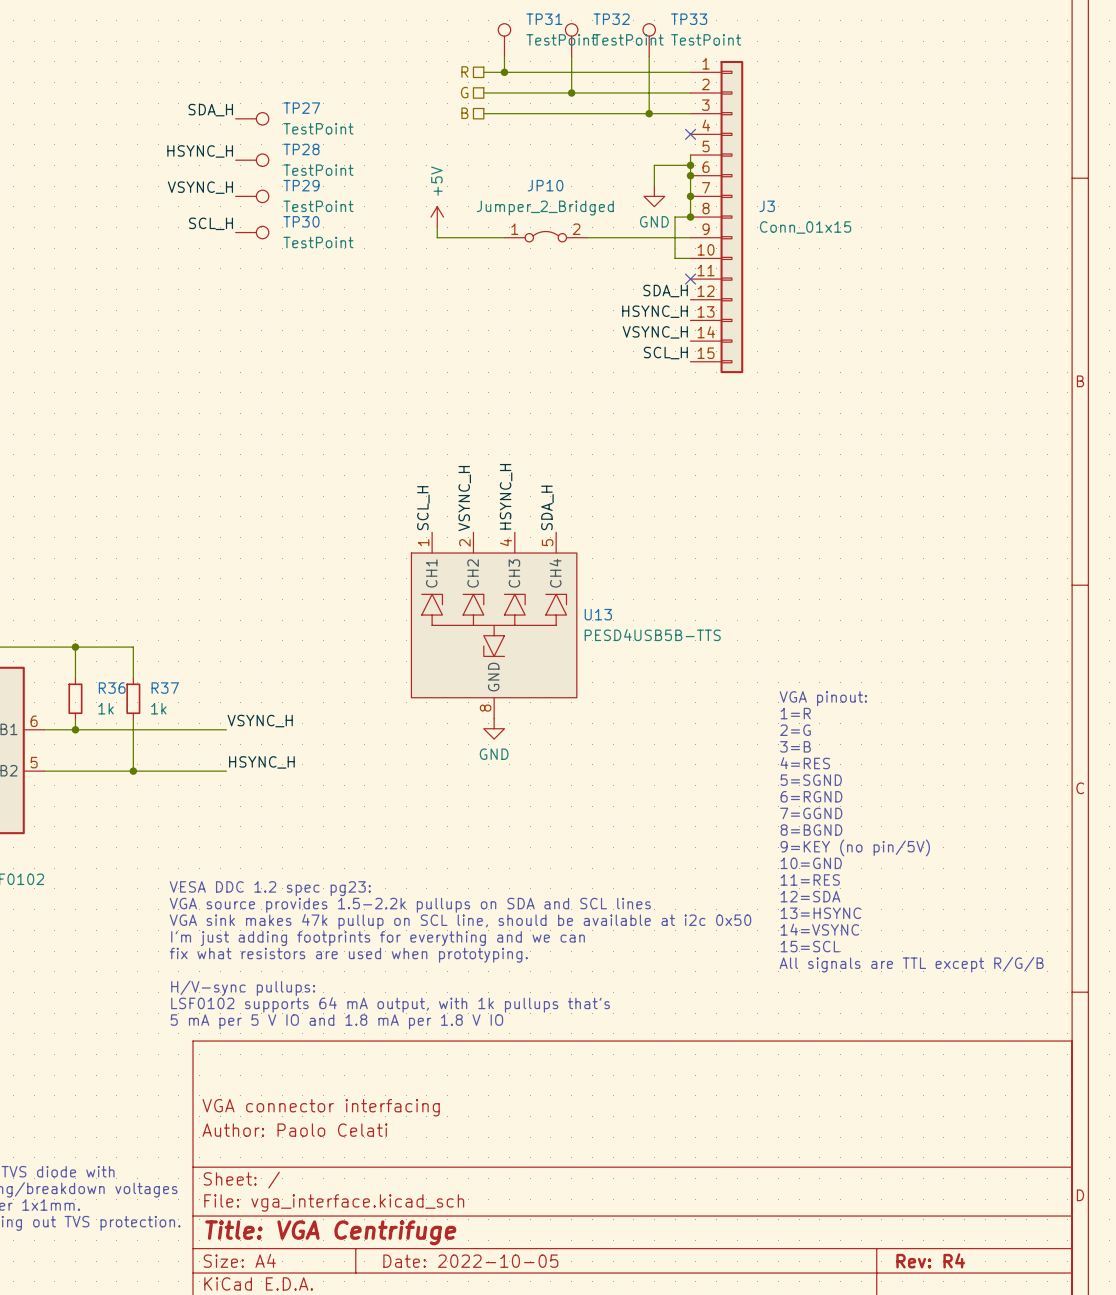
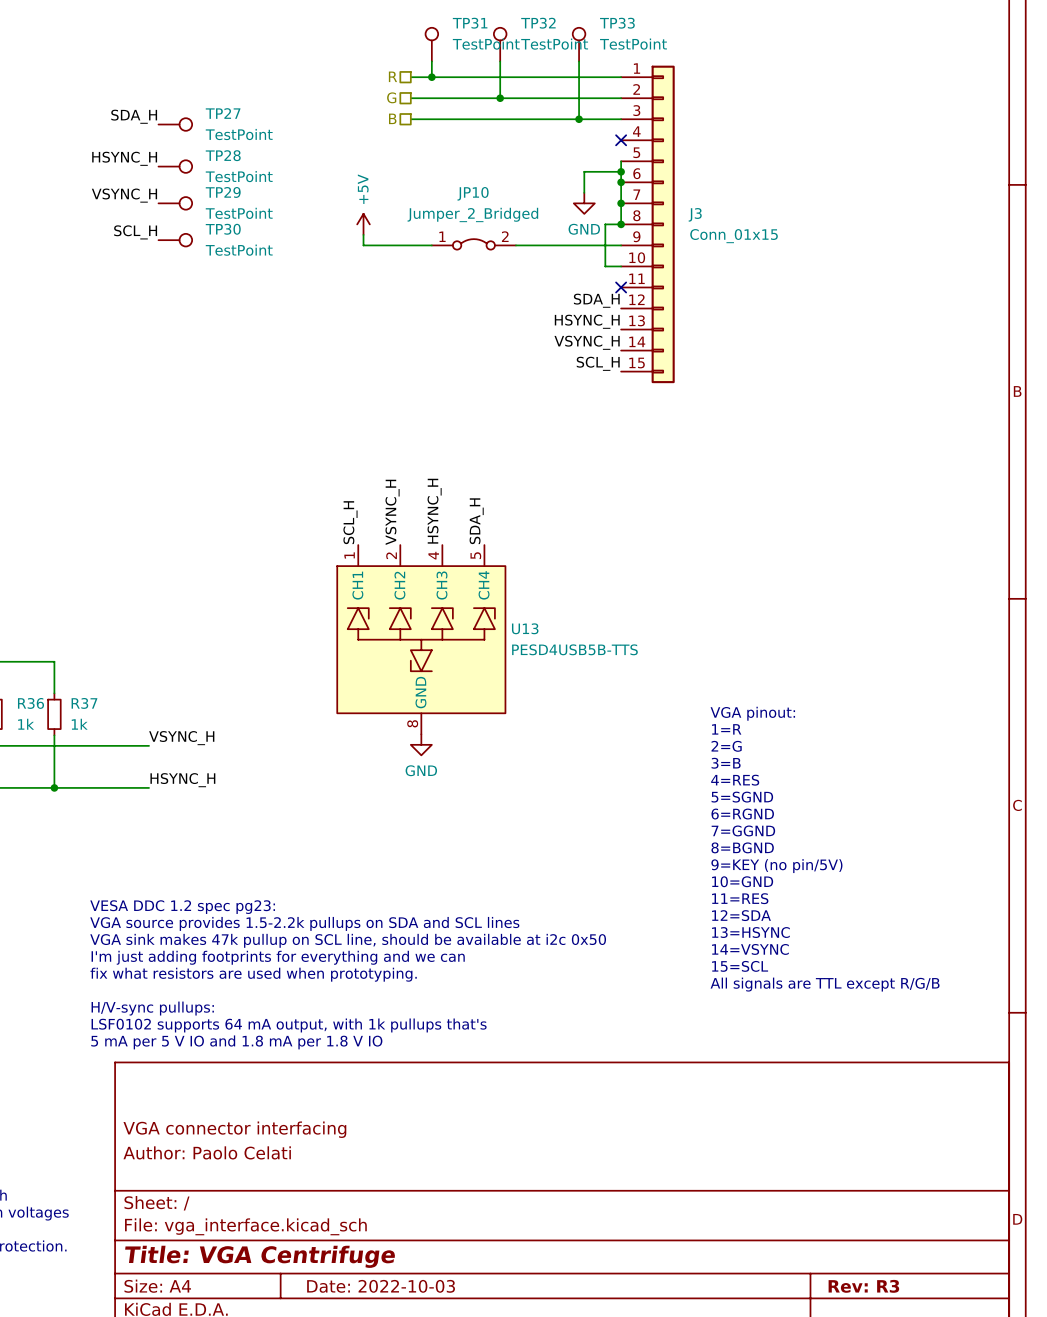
title block: Rev: R4 (930, 1260) -> Rev: R3 (863, 1286)
title block: Date: 2022-10-05 (470, 1261) -> Date: 2022-10-03 (381, 1286)

